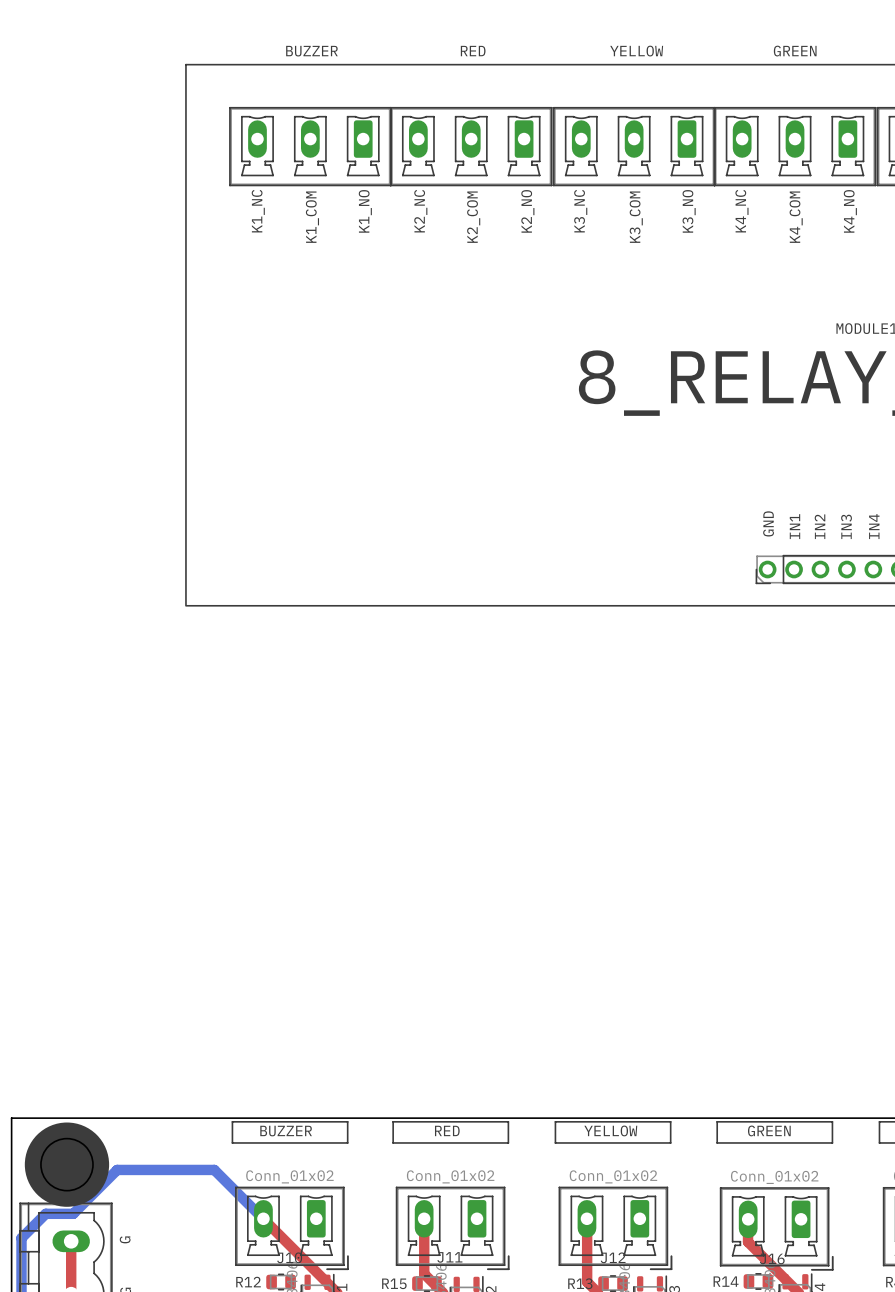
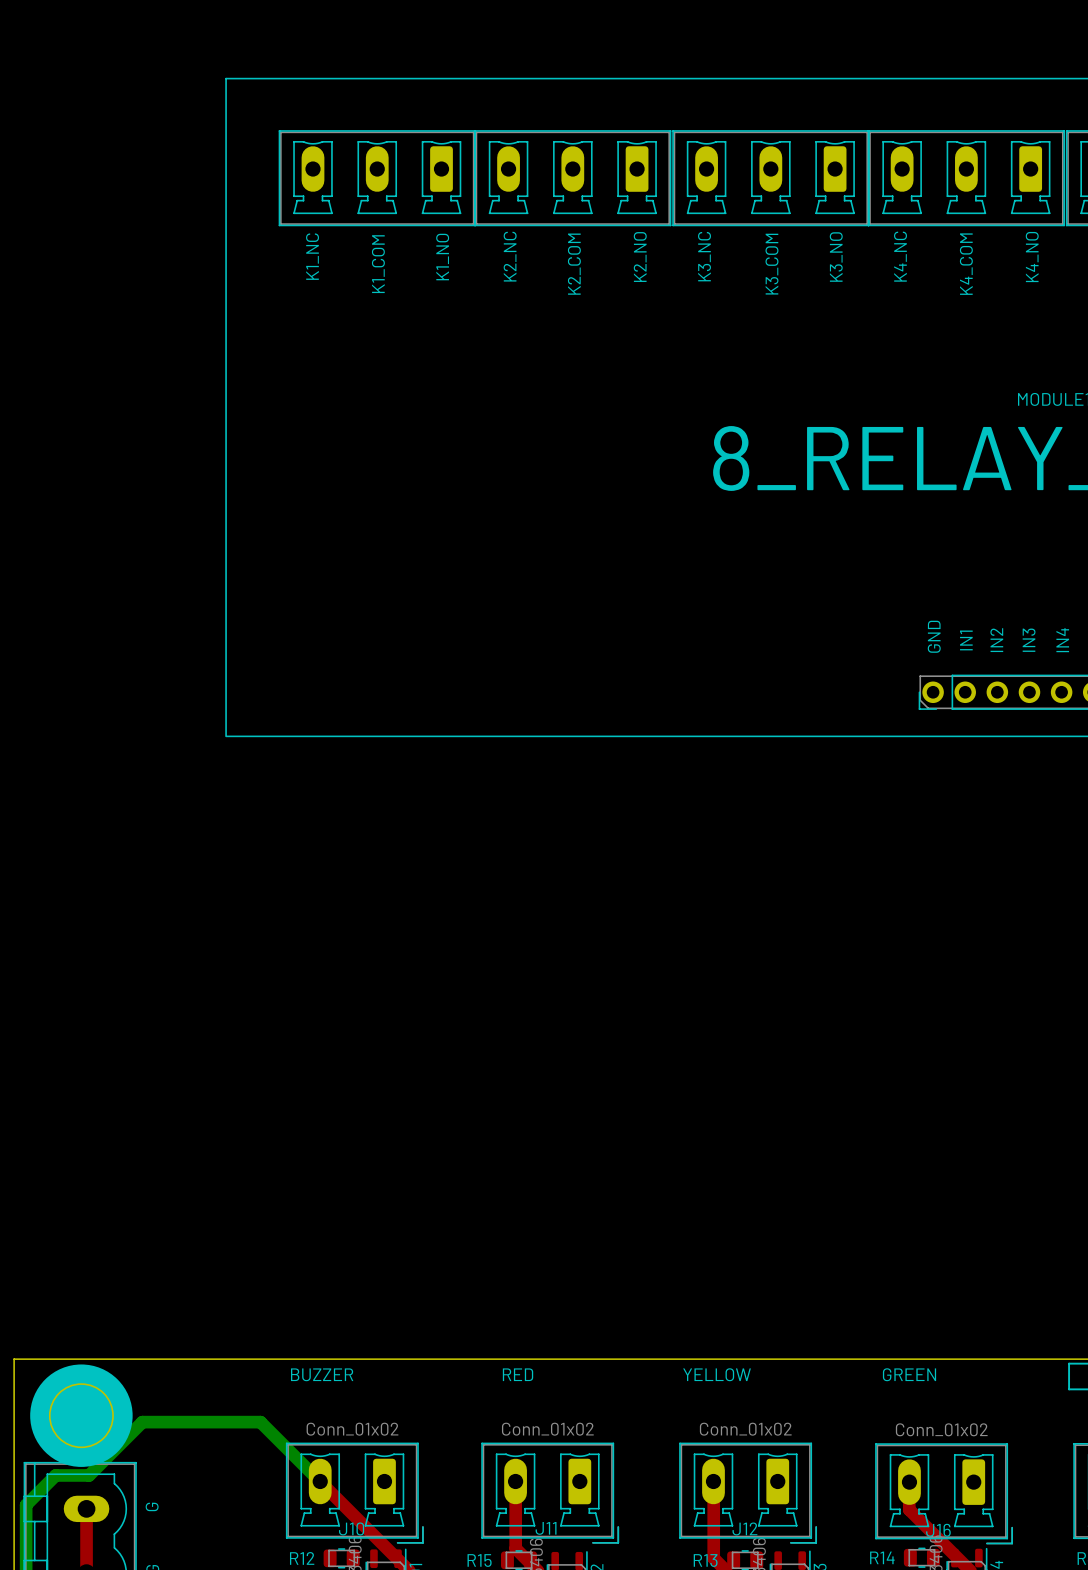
text: BUZZER (311, 51) -> none
text: RED (473, 51) -> none
text: YELLOW (636, 51) -> none
text: GREEN (795, 51) -> none
line: (232, 1121) (347, 1121) (347, 1142) (232, 1142) (232, 1121) -> none
line: (393, 1121) (508, 1121) (508, 1142) (393, 1142) (393, 1121) -> none
line: (555, 1121) (670, 1121) (670, 1142) (555, 1142) (555, 1121) -> none
line: (717, 1121) (832, 1121) (832, 1142) (717, 1142) (717, 1121) -> none
text position: RED (447, 1130) -> RED (518, 1374)
text position: YELLOW (610, 1130) -> YELLOW (717, 1374)
text position: GREEN (769, 1130) -> GREEN (909, 1374)
text position: BUZZER (286, 1131) -> BUZZER (322, 1374)

